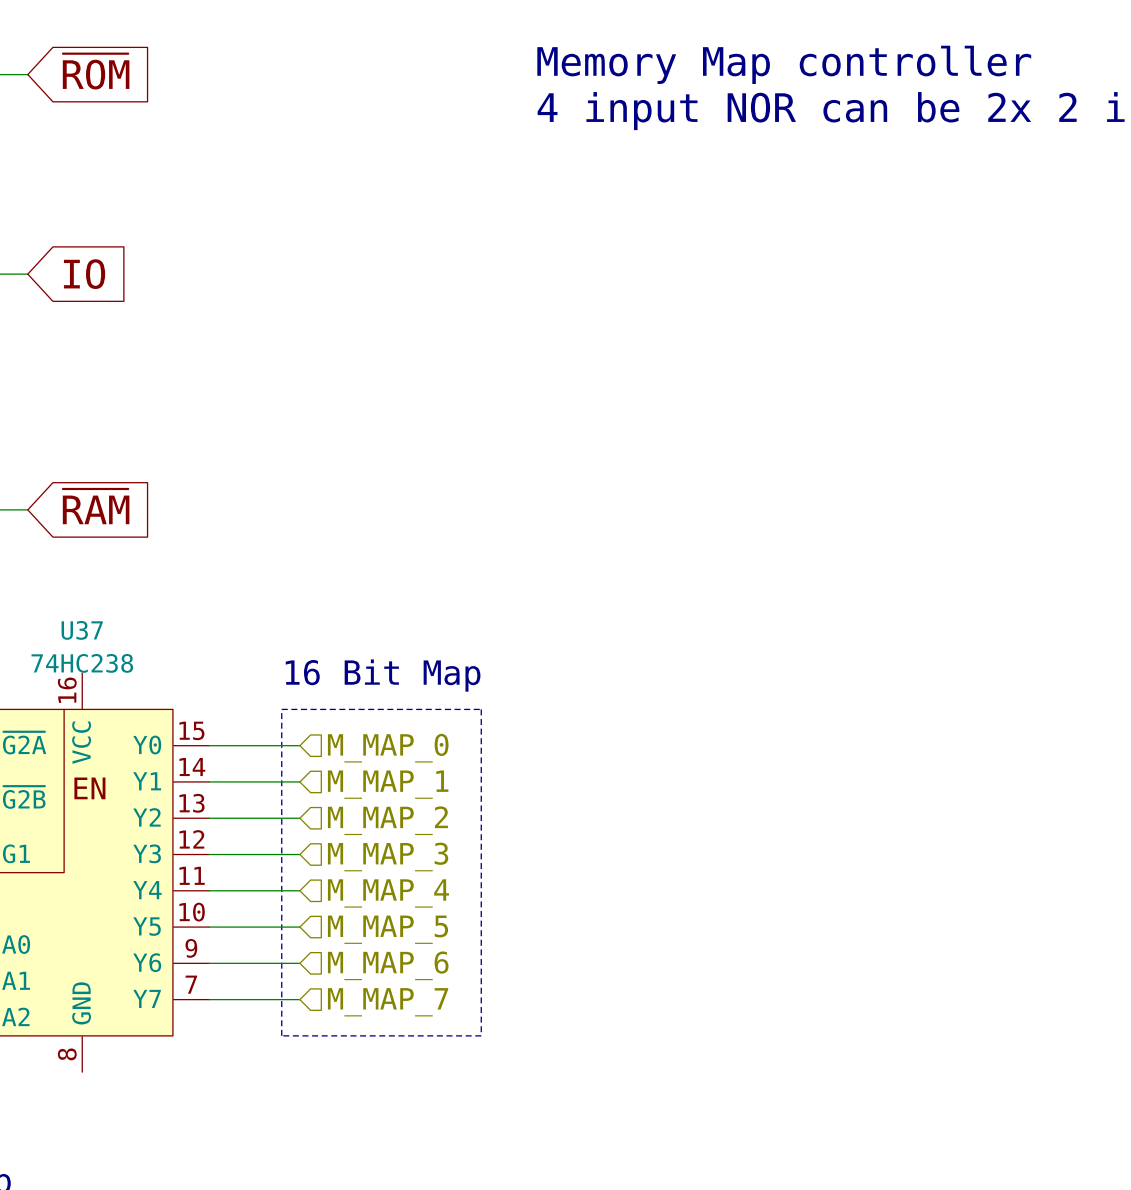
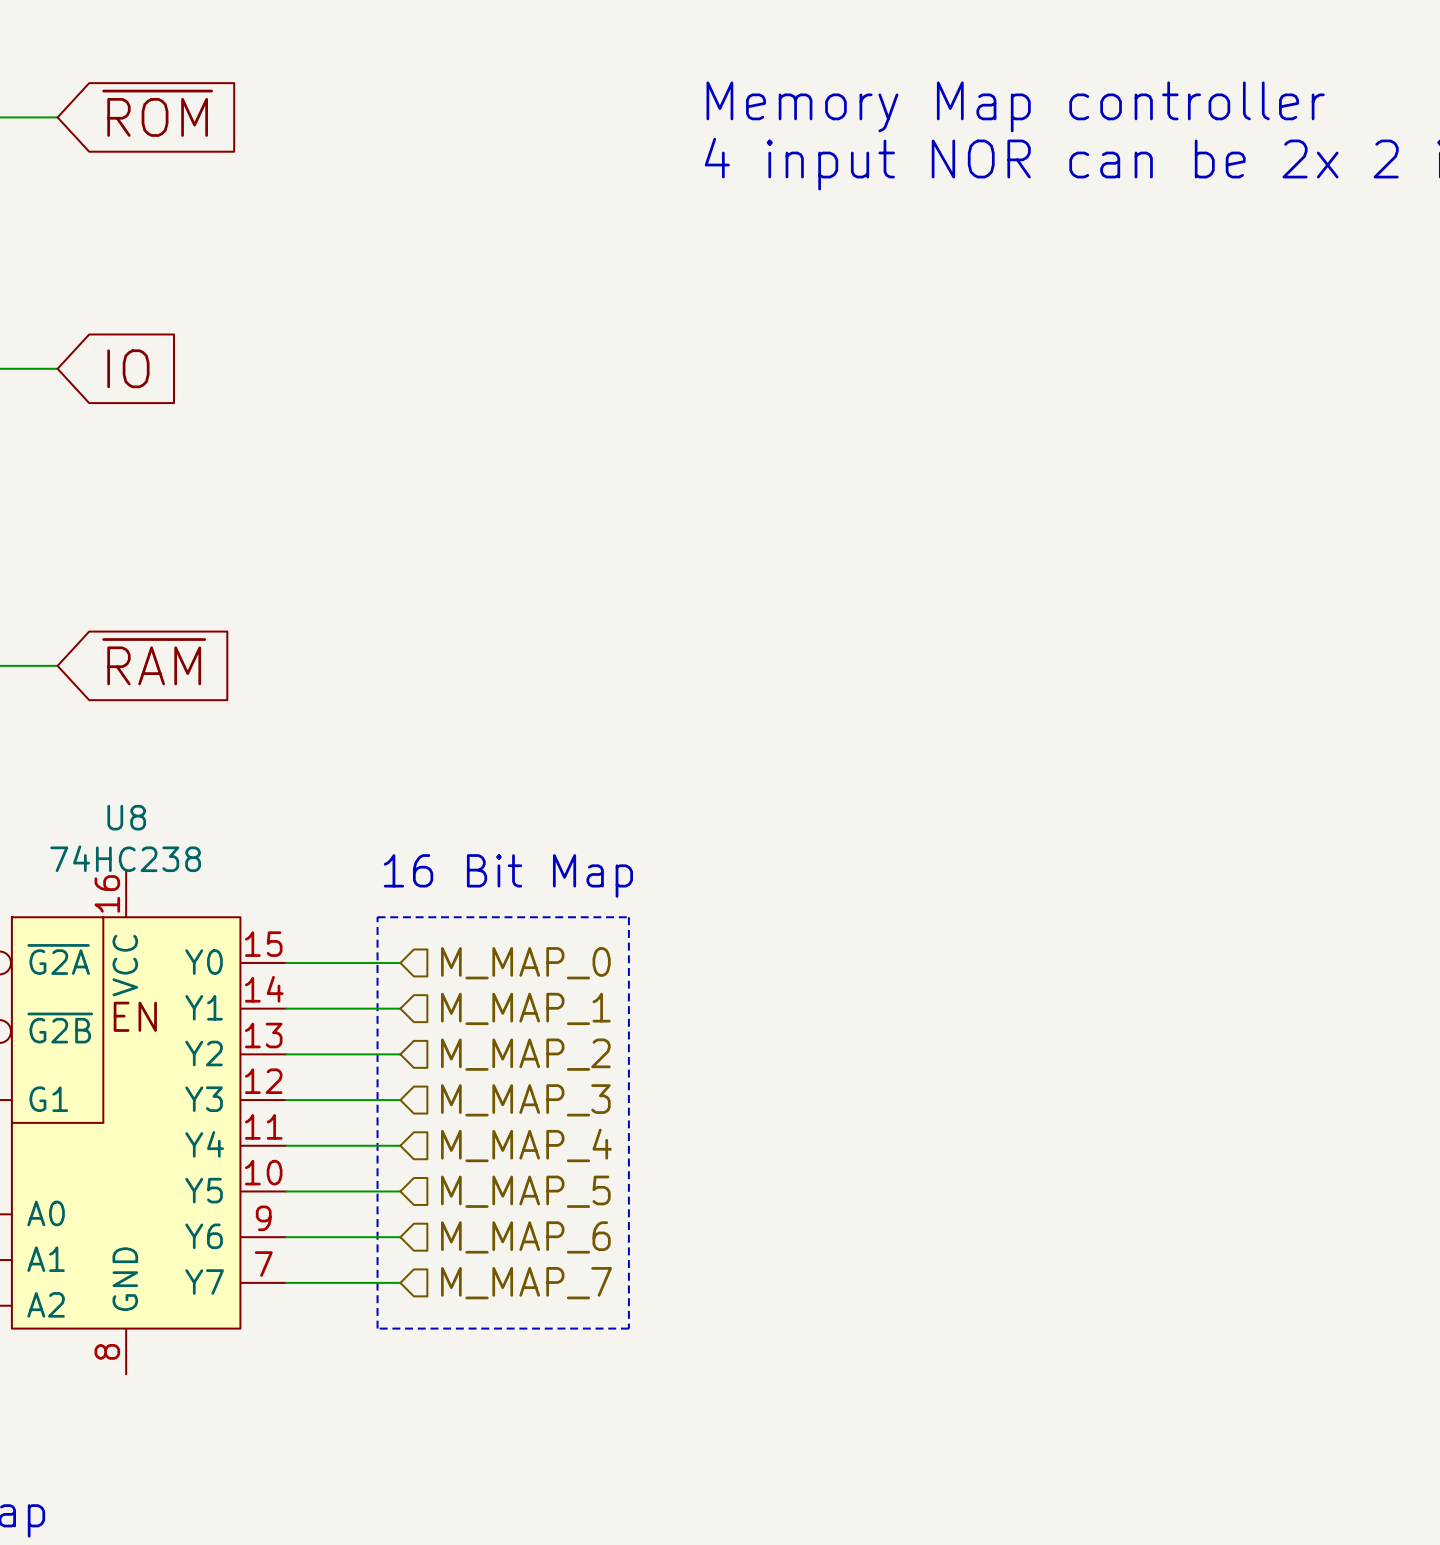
U37 name: U37 (82, 630) -> U8 (126, 817)

